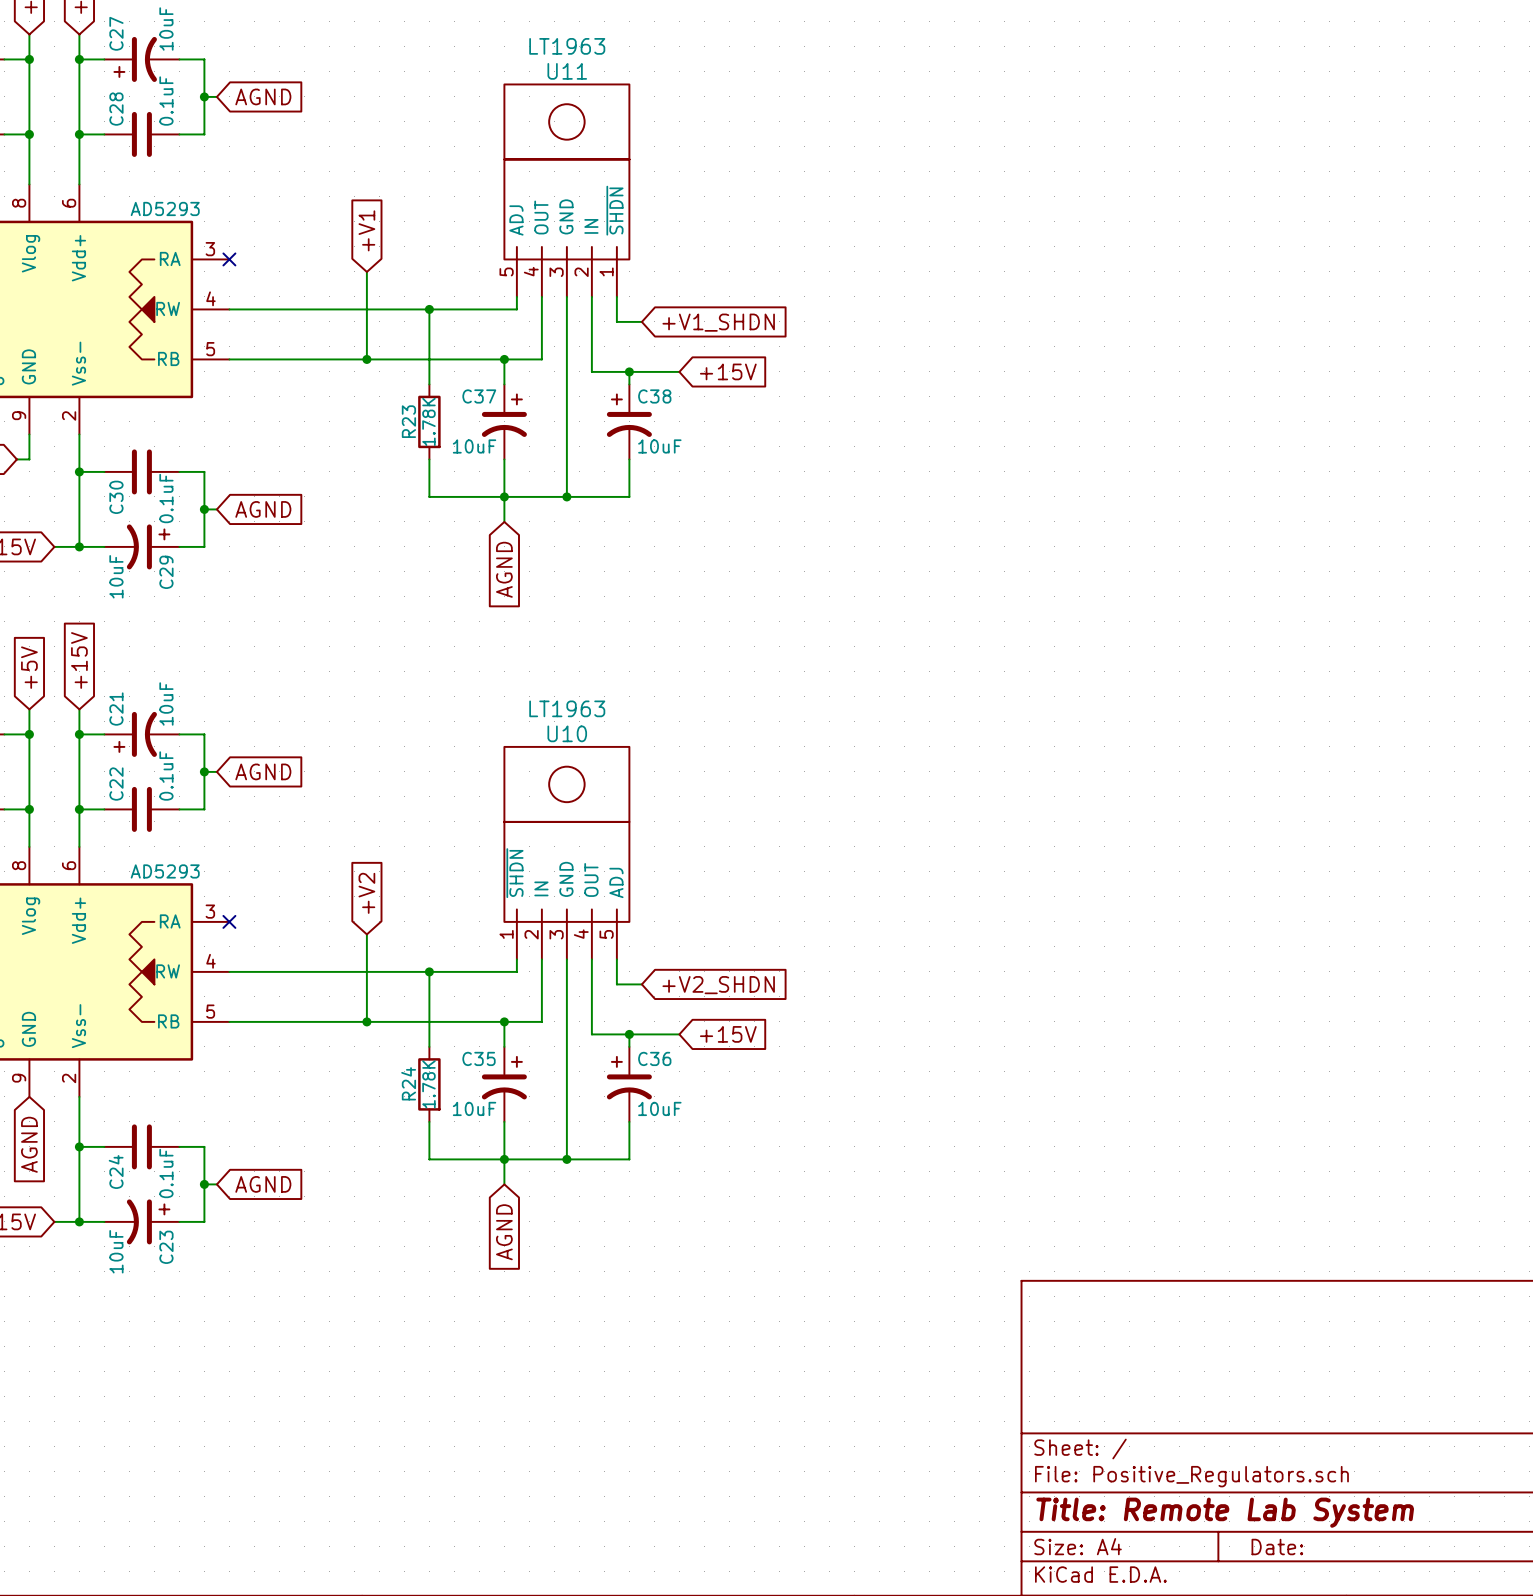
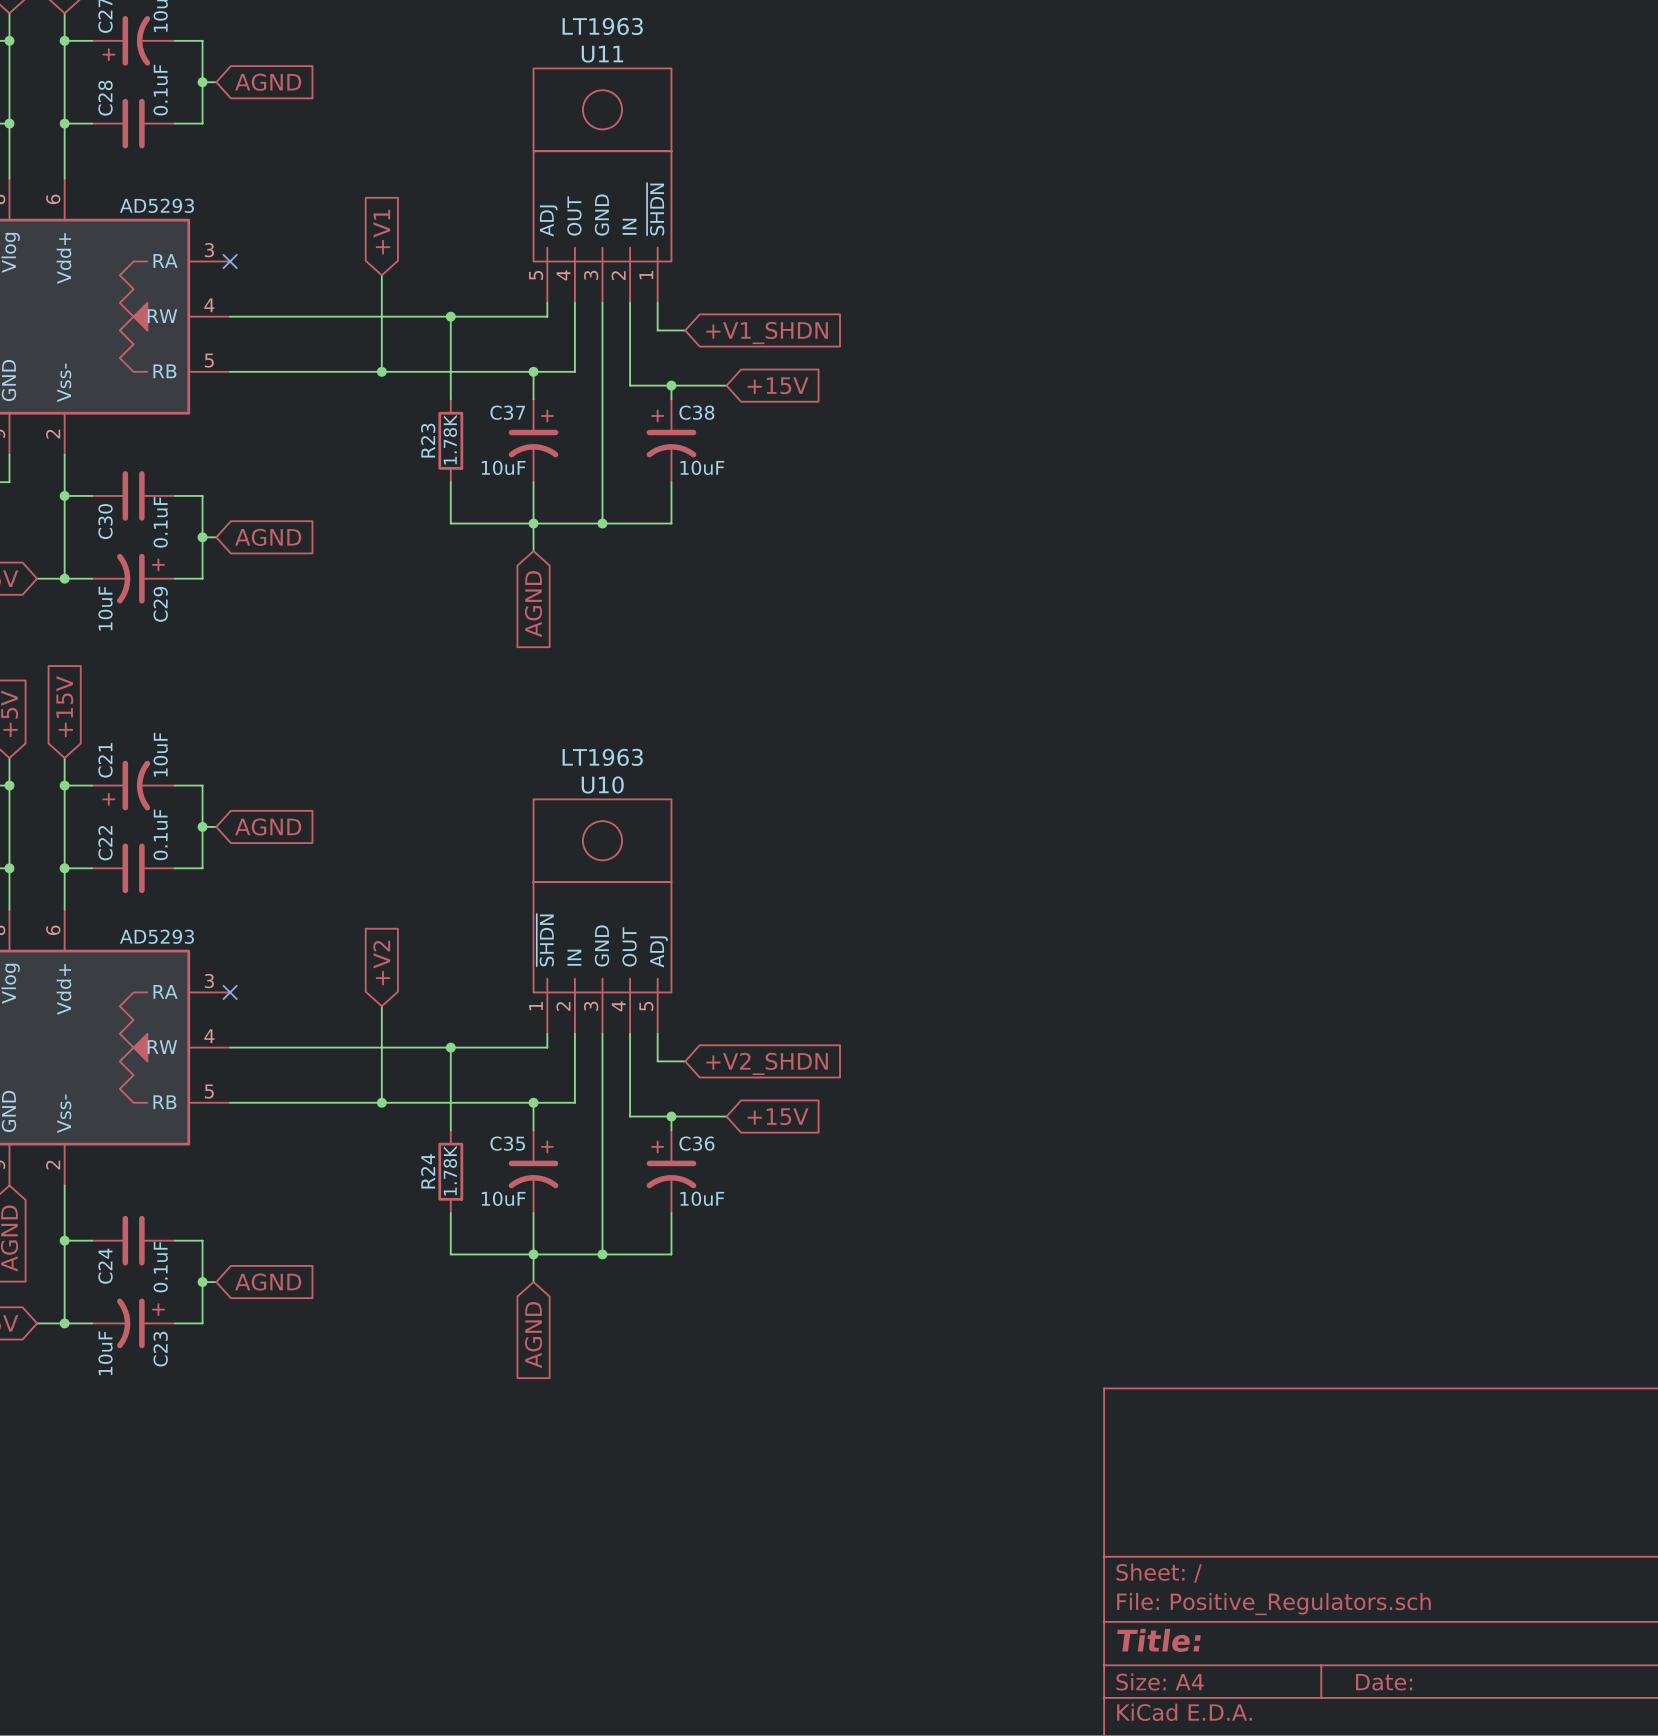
title block: Title: Remote Lab System (1225, 1512) -> Title: (1159, 1640)

